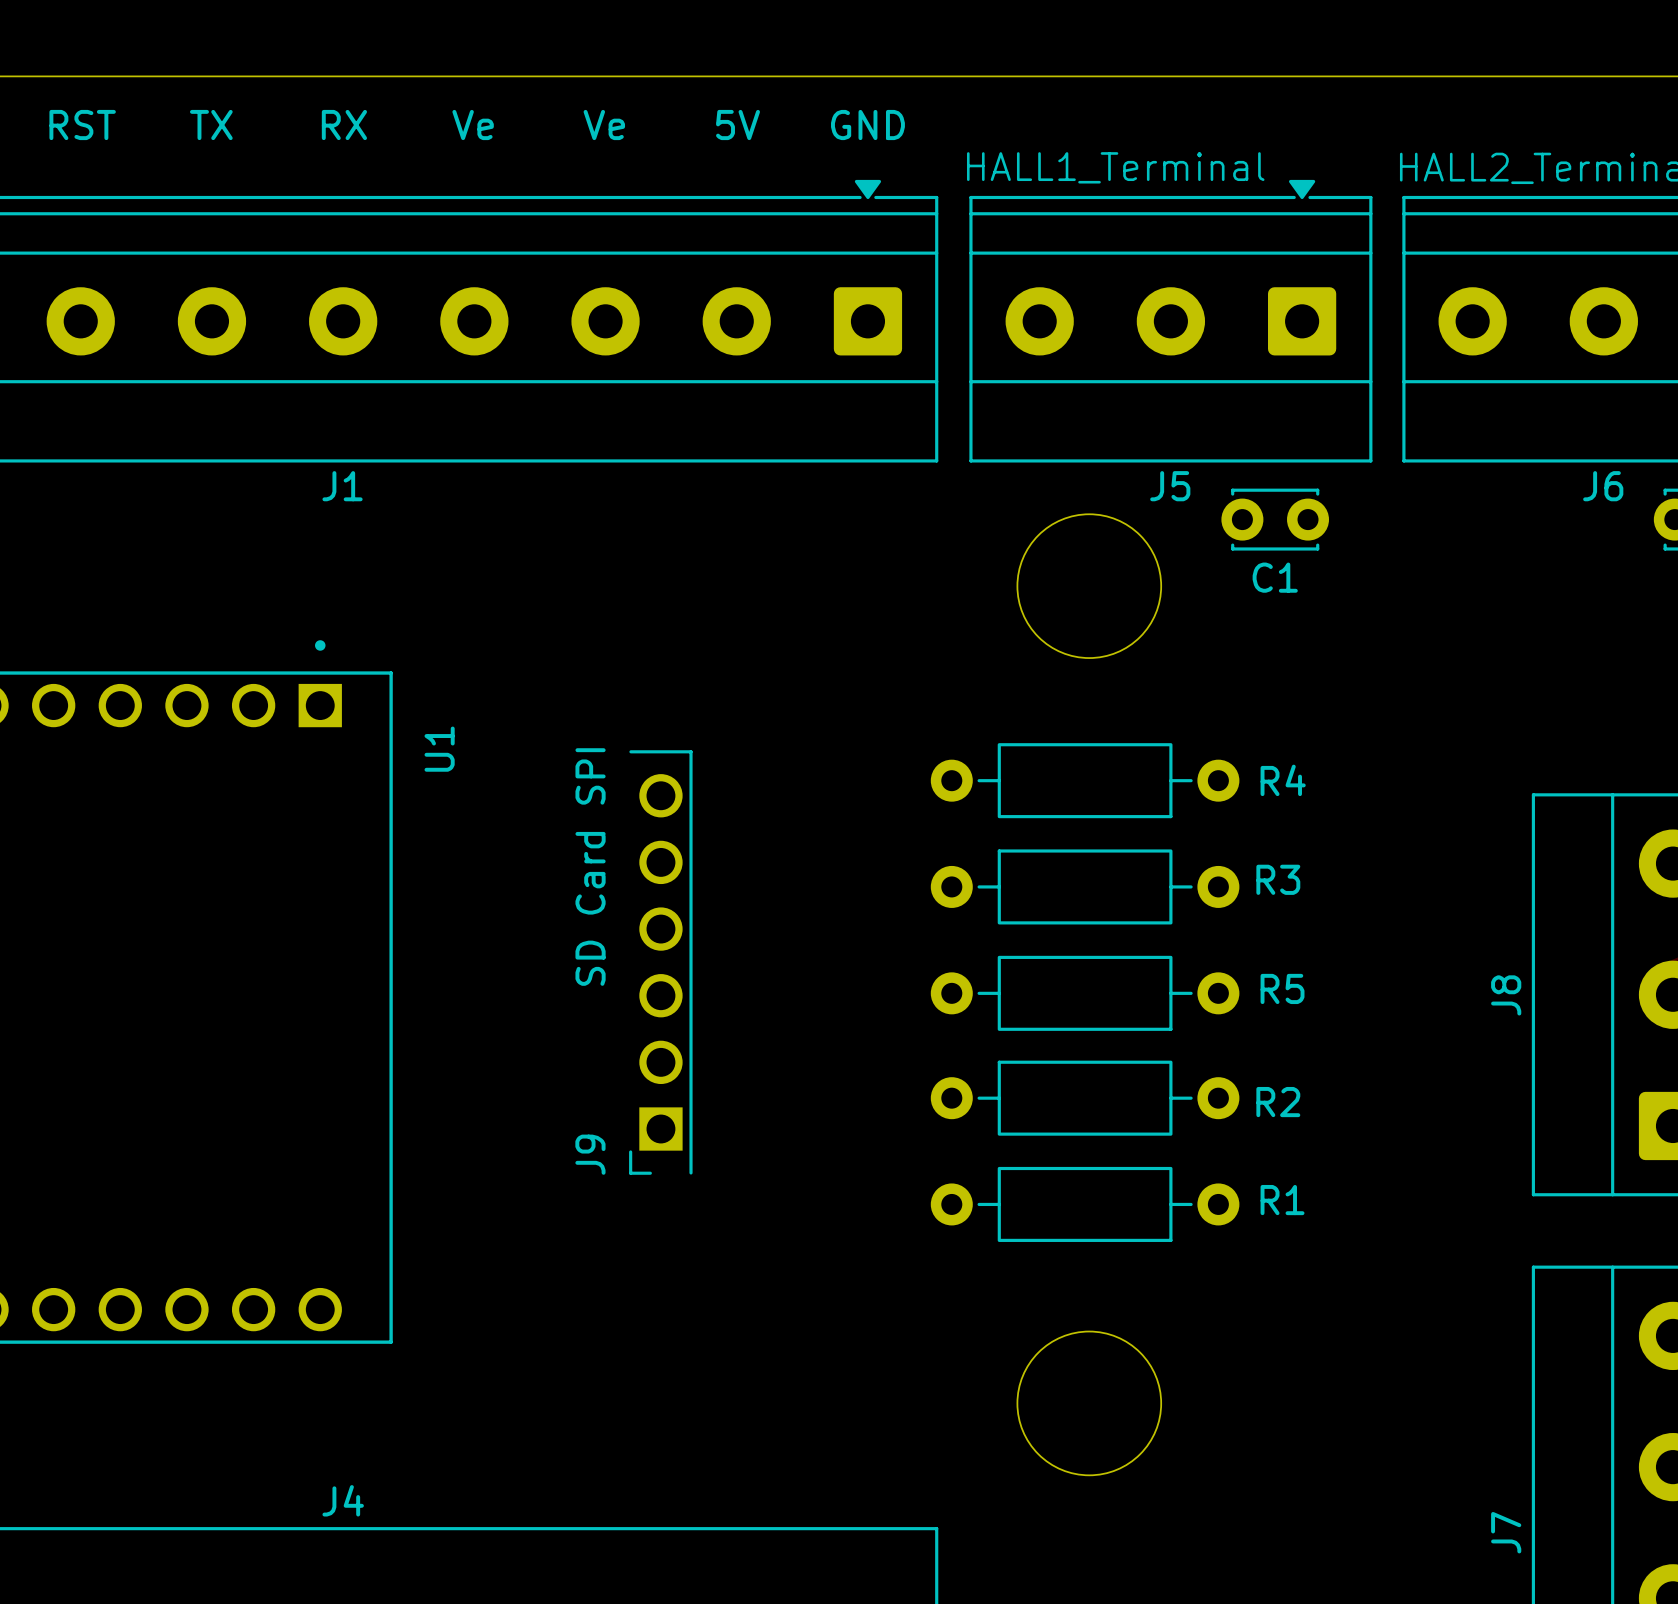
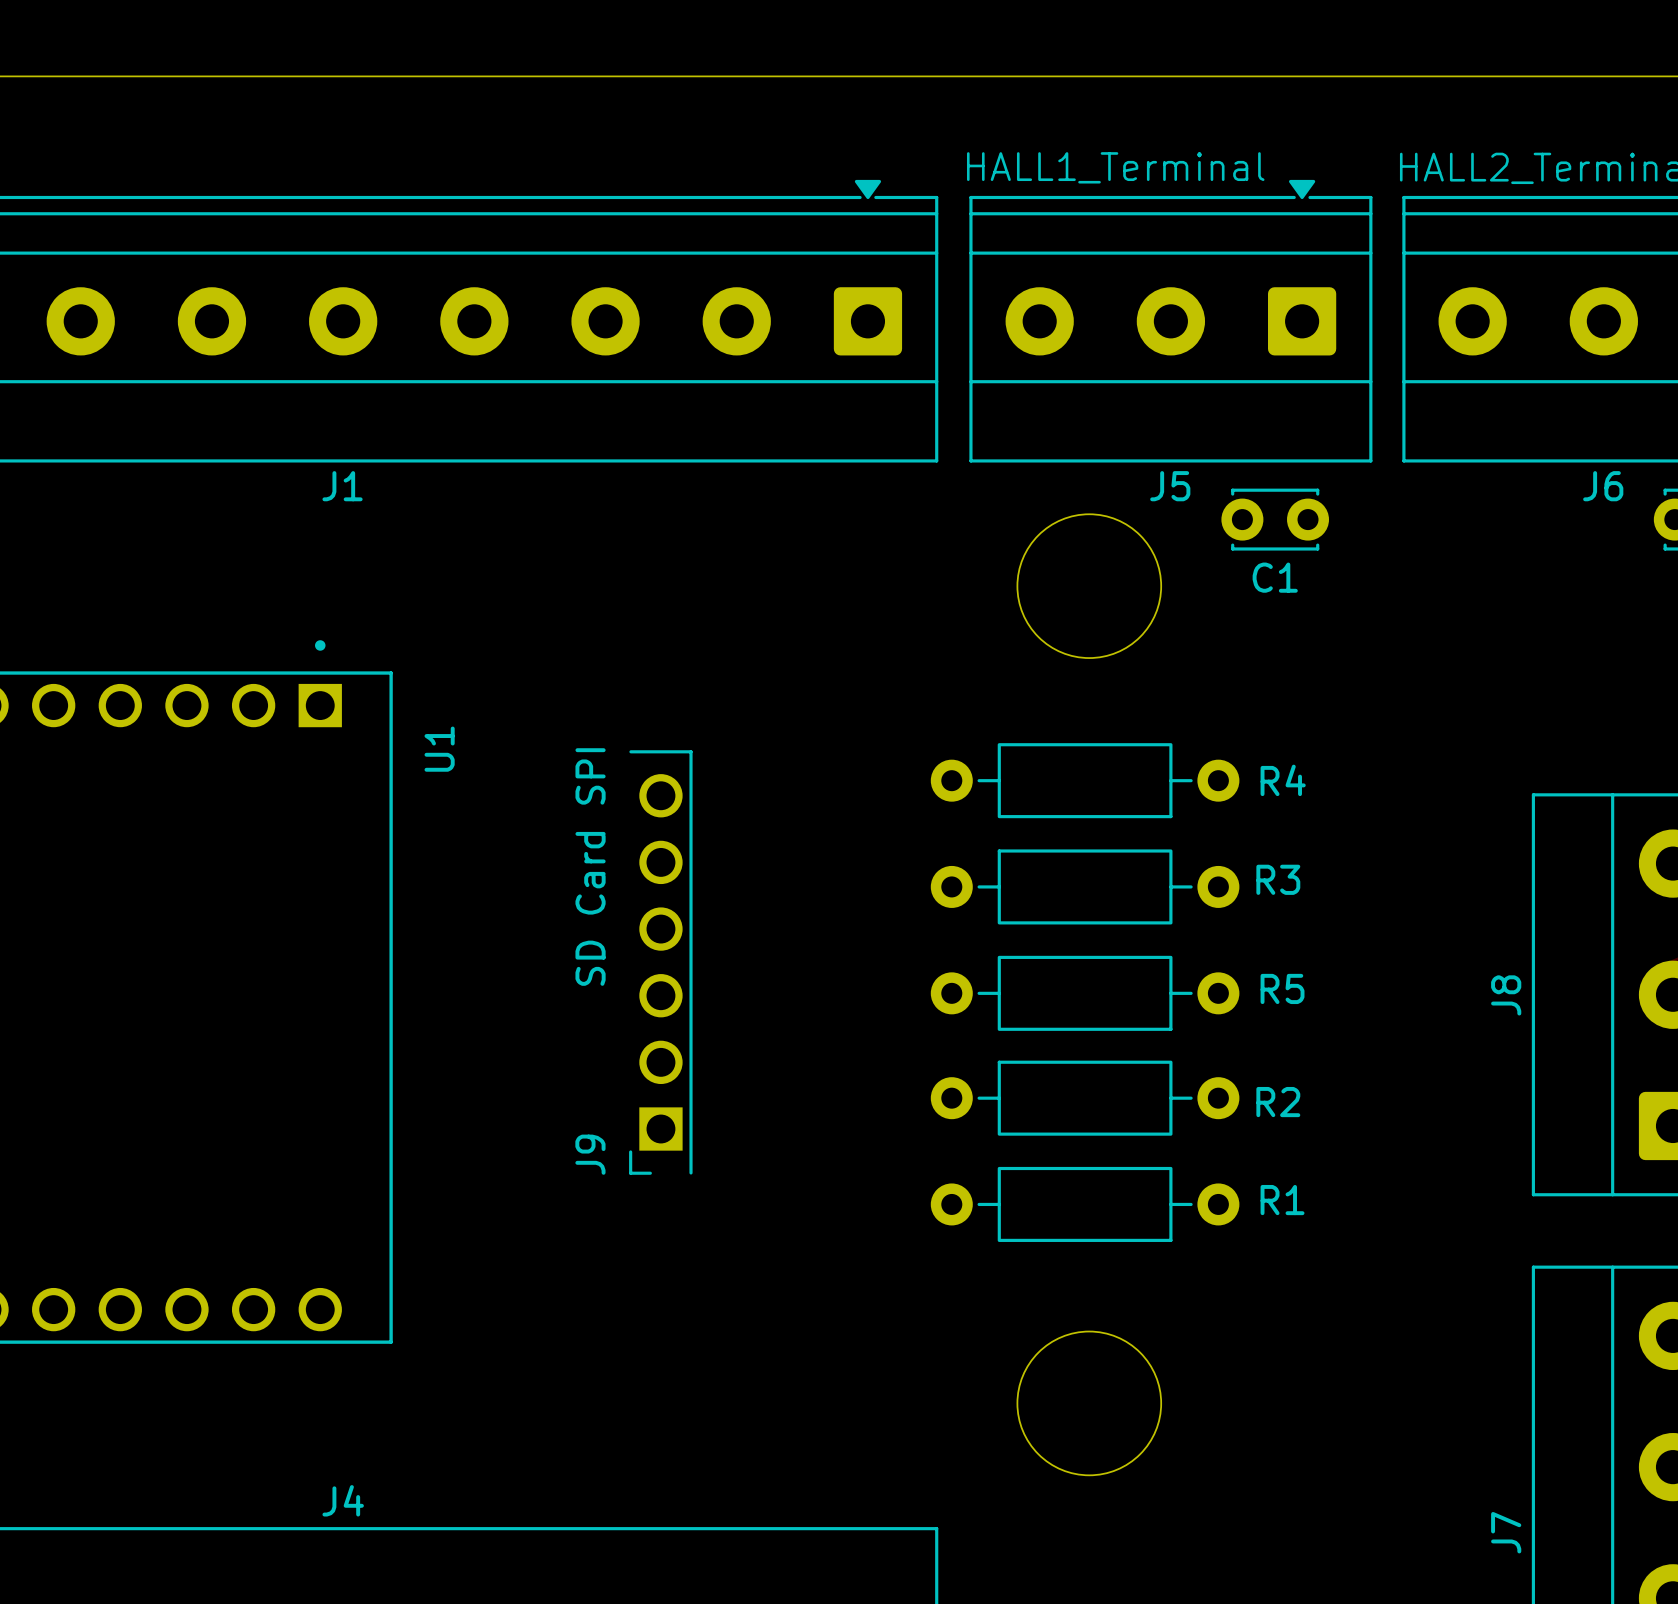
text: RST (82, 125) -> none
text: TX (211, 125) -> none
text: RX (344, 125) -> none
text: Ve (473, 125) -> none
text: Ve (604, 125) -> none
text: 5V (738, 125) -> none
text: GND (867, 125) -> none

